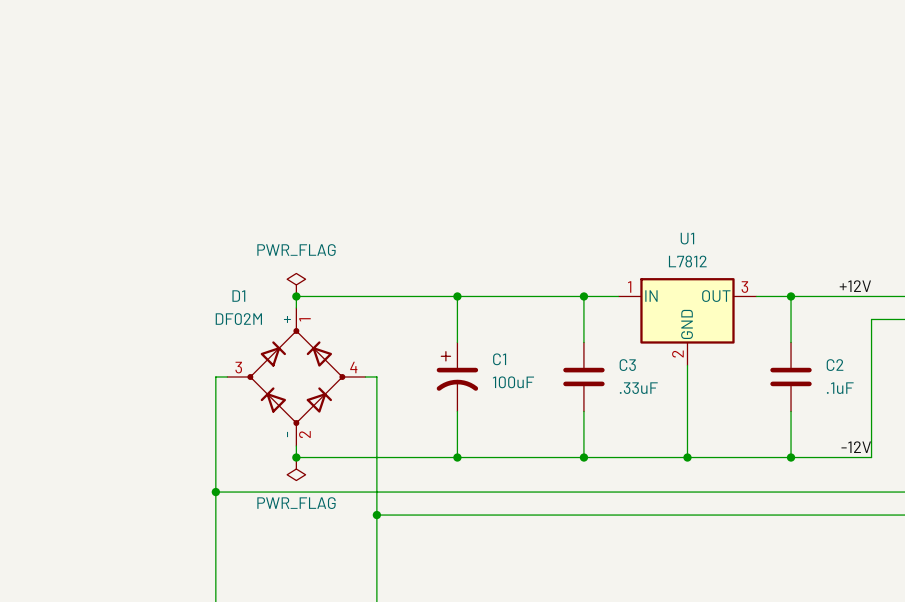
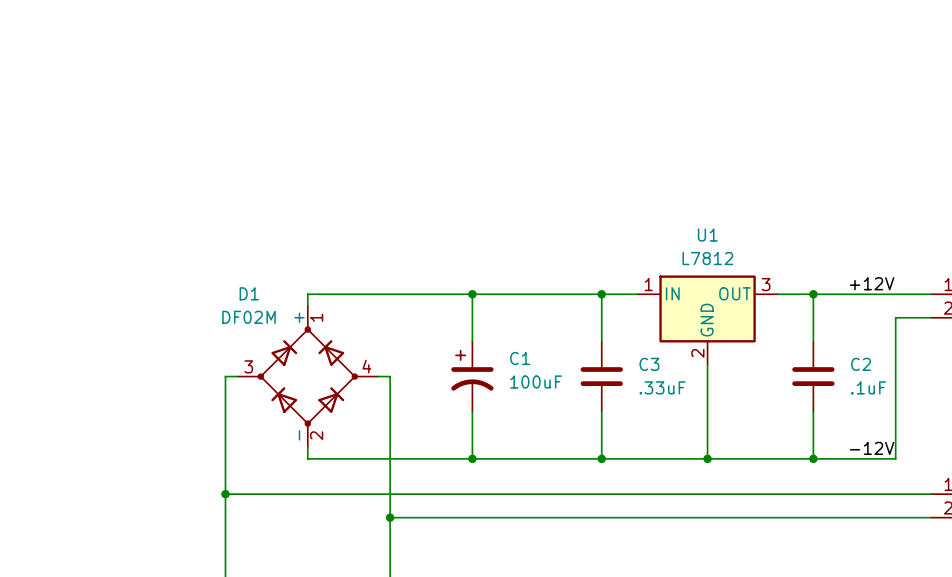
power symbol: PWR_FLAG (296, 284) -> none
junction: (296, 296) -> none
junction: (296, 457) -> none
power symbol: PWR_FLAG (296, 469) -> none

